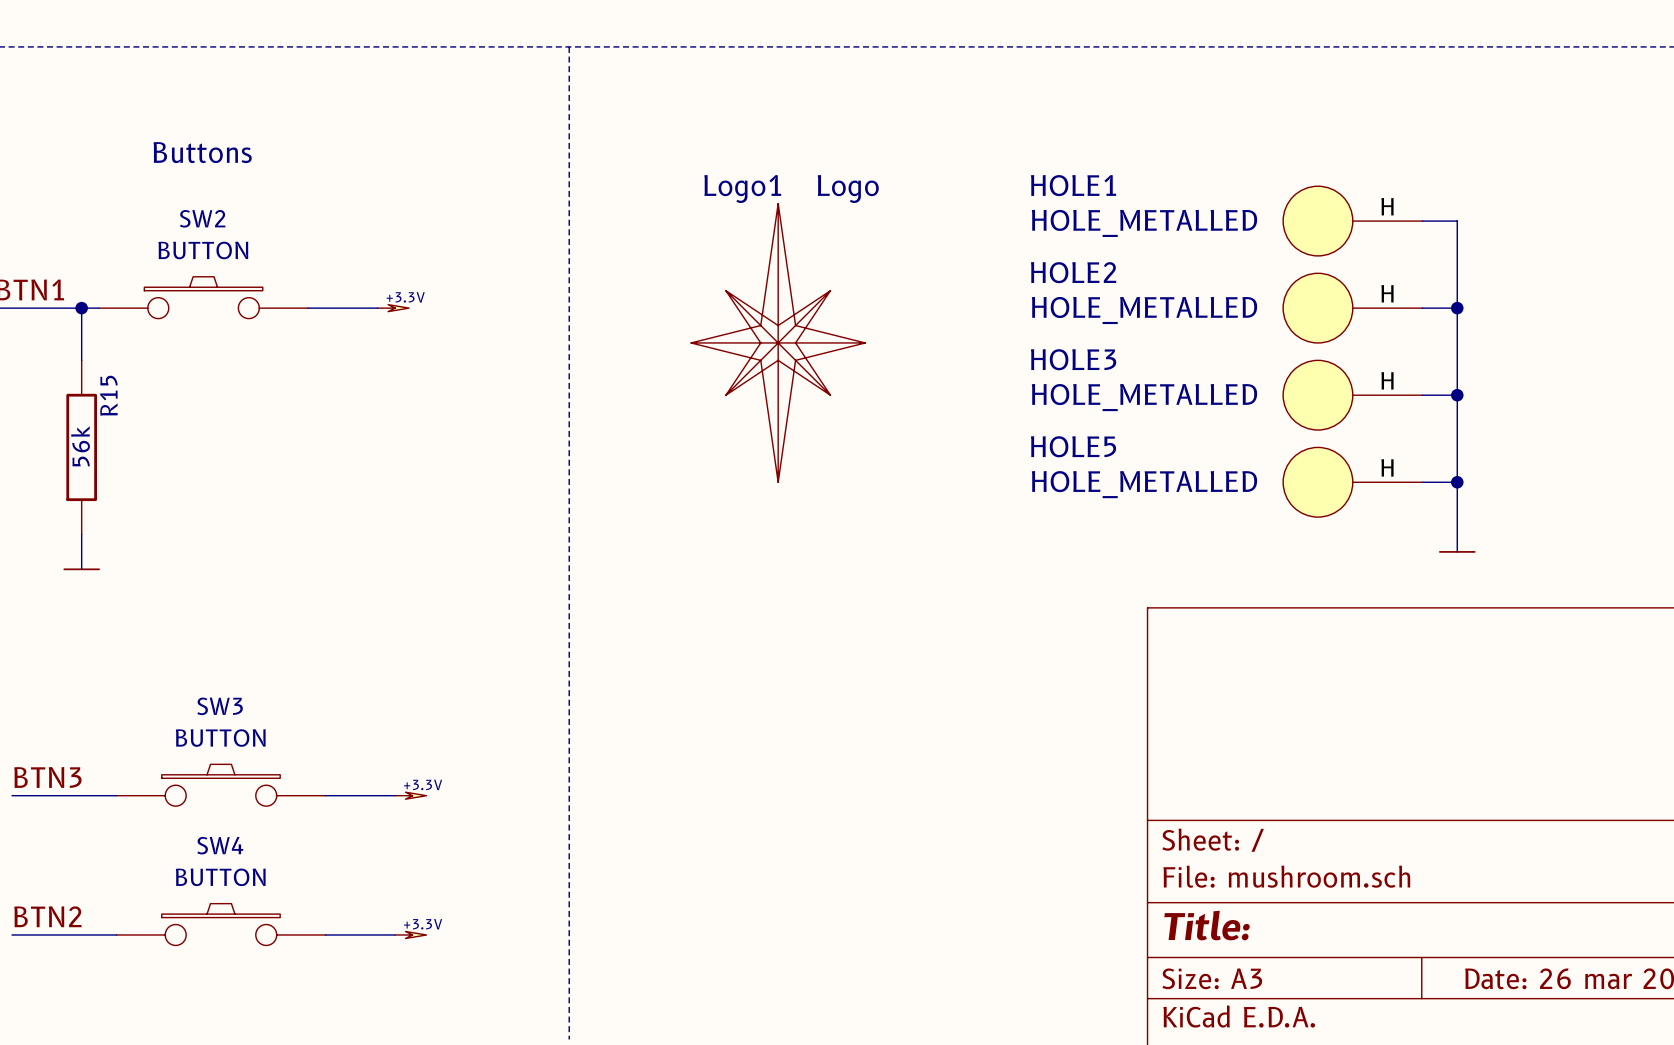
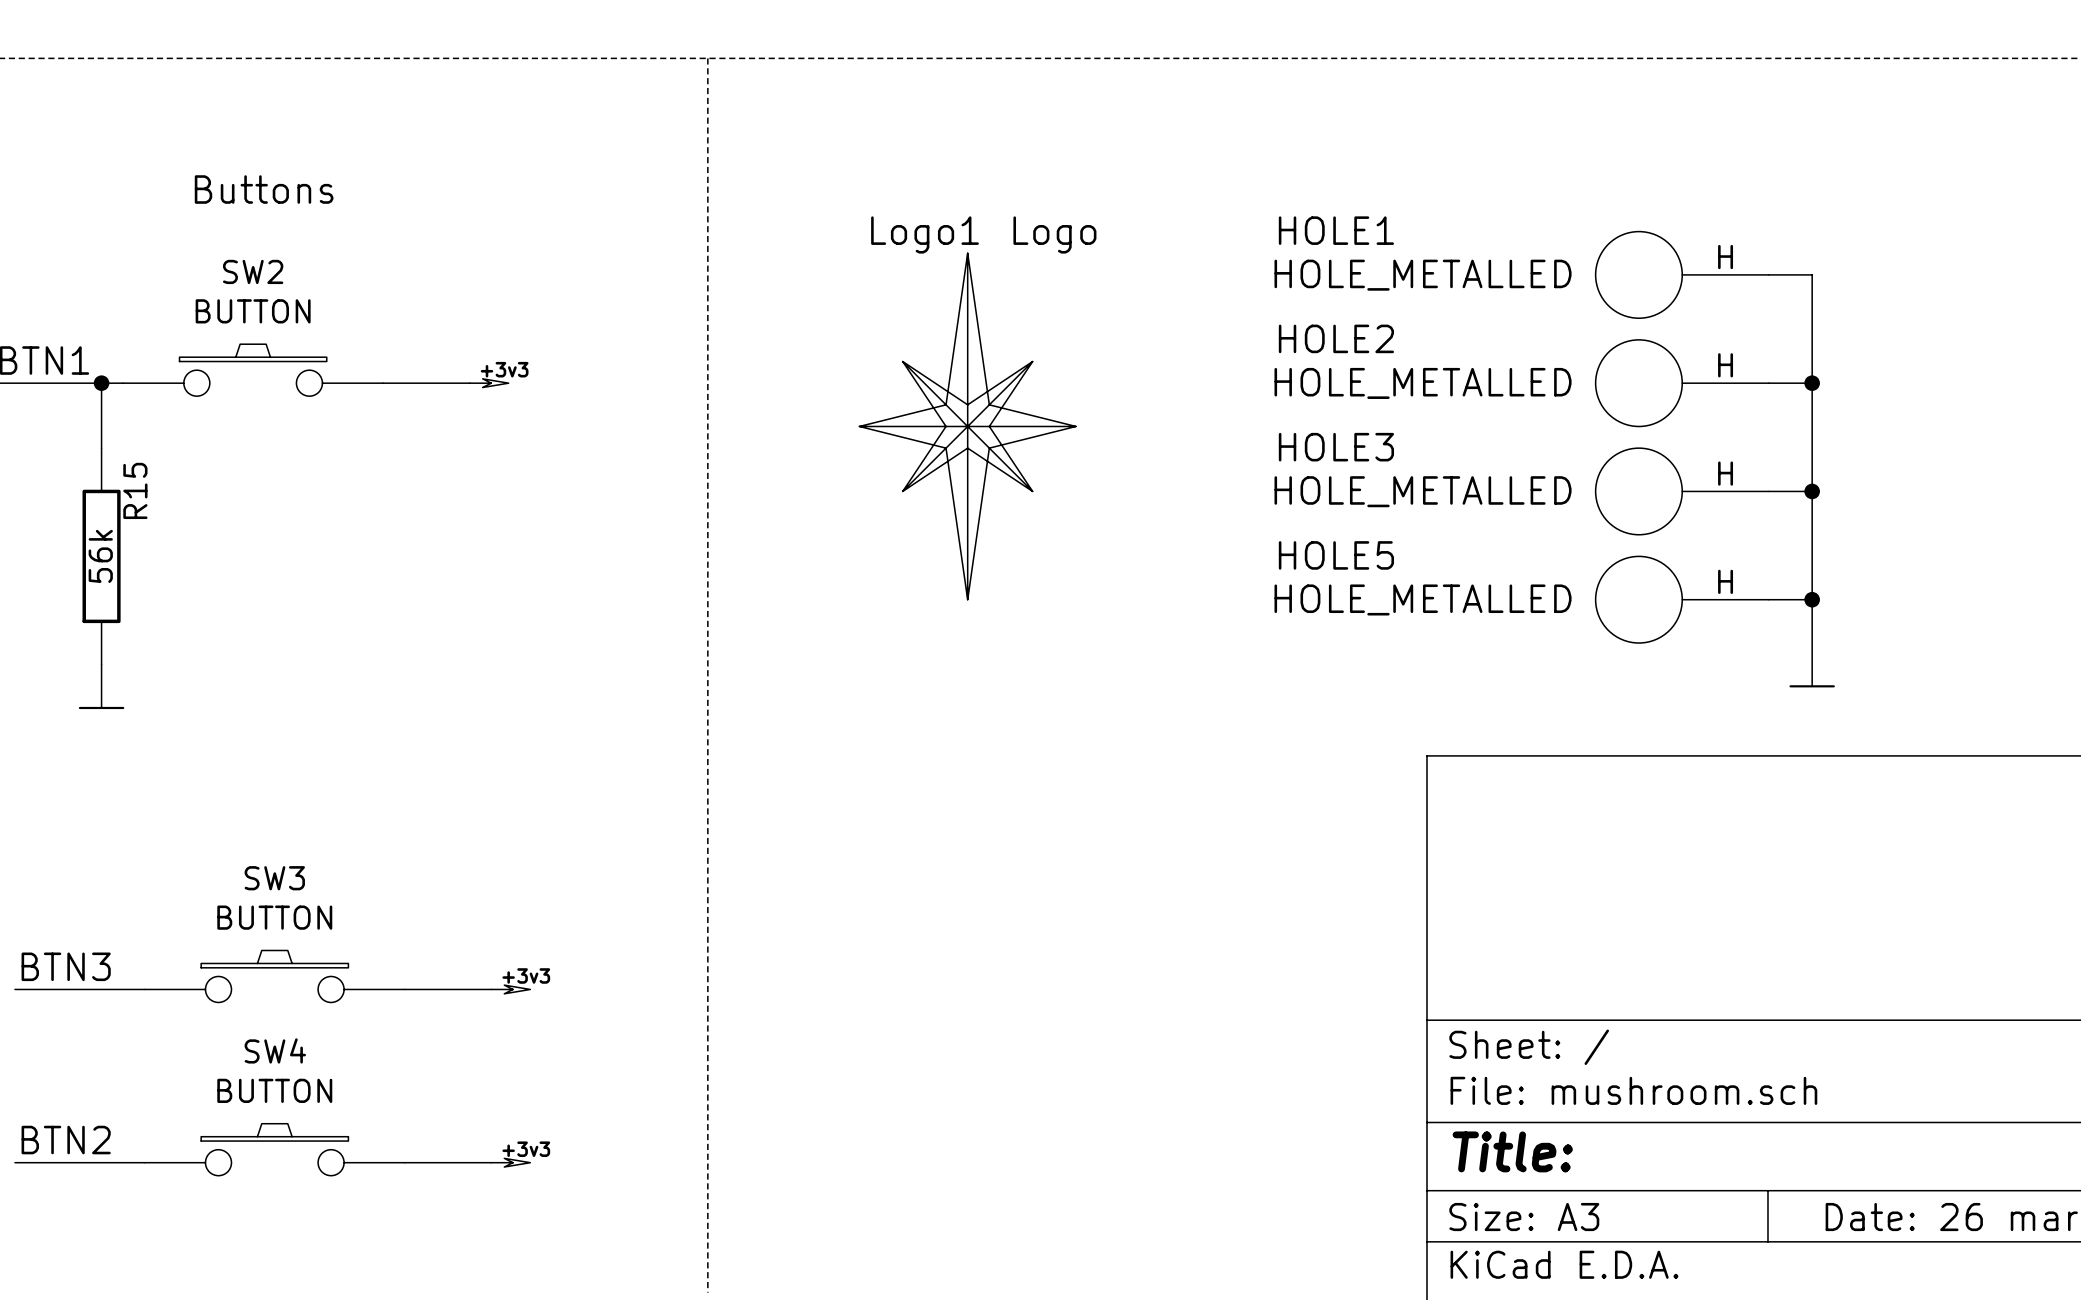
power symbol: +3.3V (393, 308) -> +3v3 (489, 383)
power symbol: +3.3V (410, 795) -> +3v3 (510, 989)
power symbol: +3.3V (410, 934) -> +3v3 (510, 1162)

